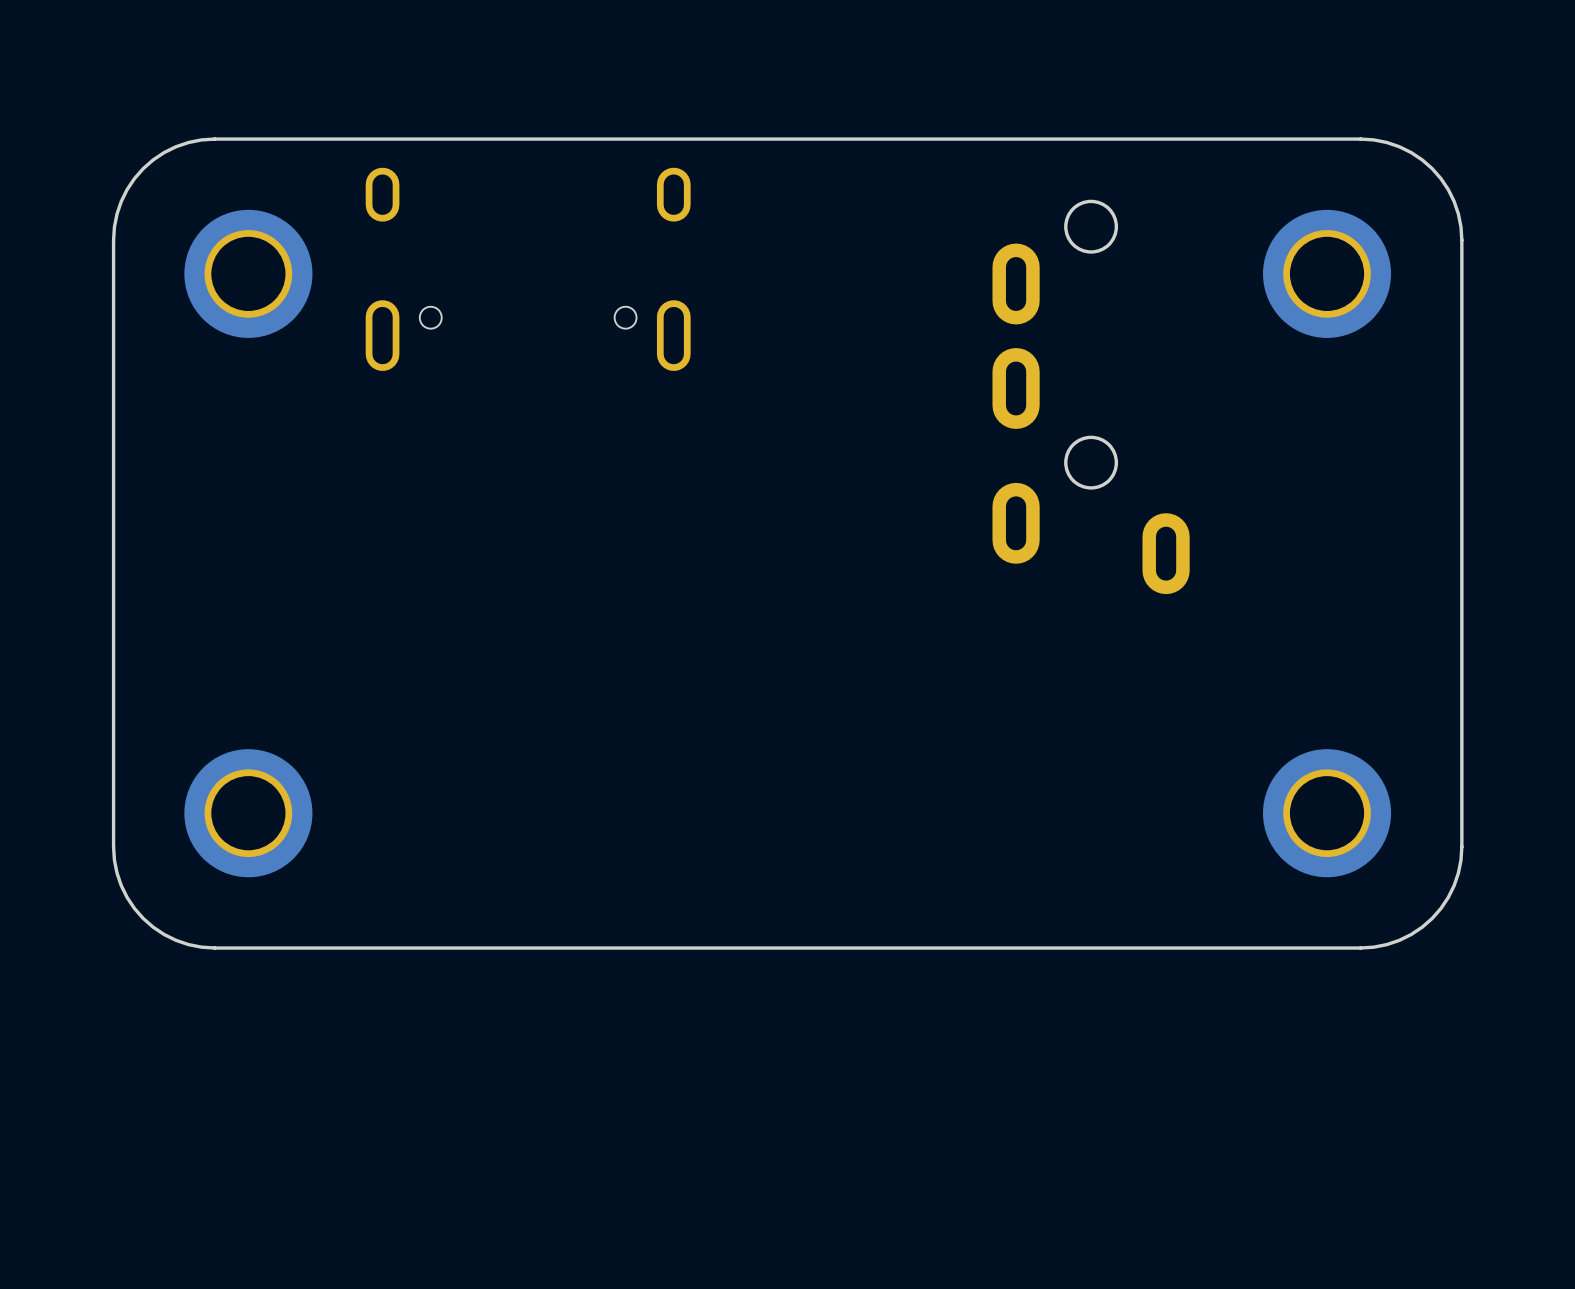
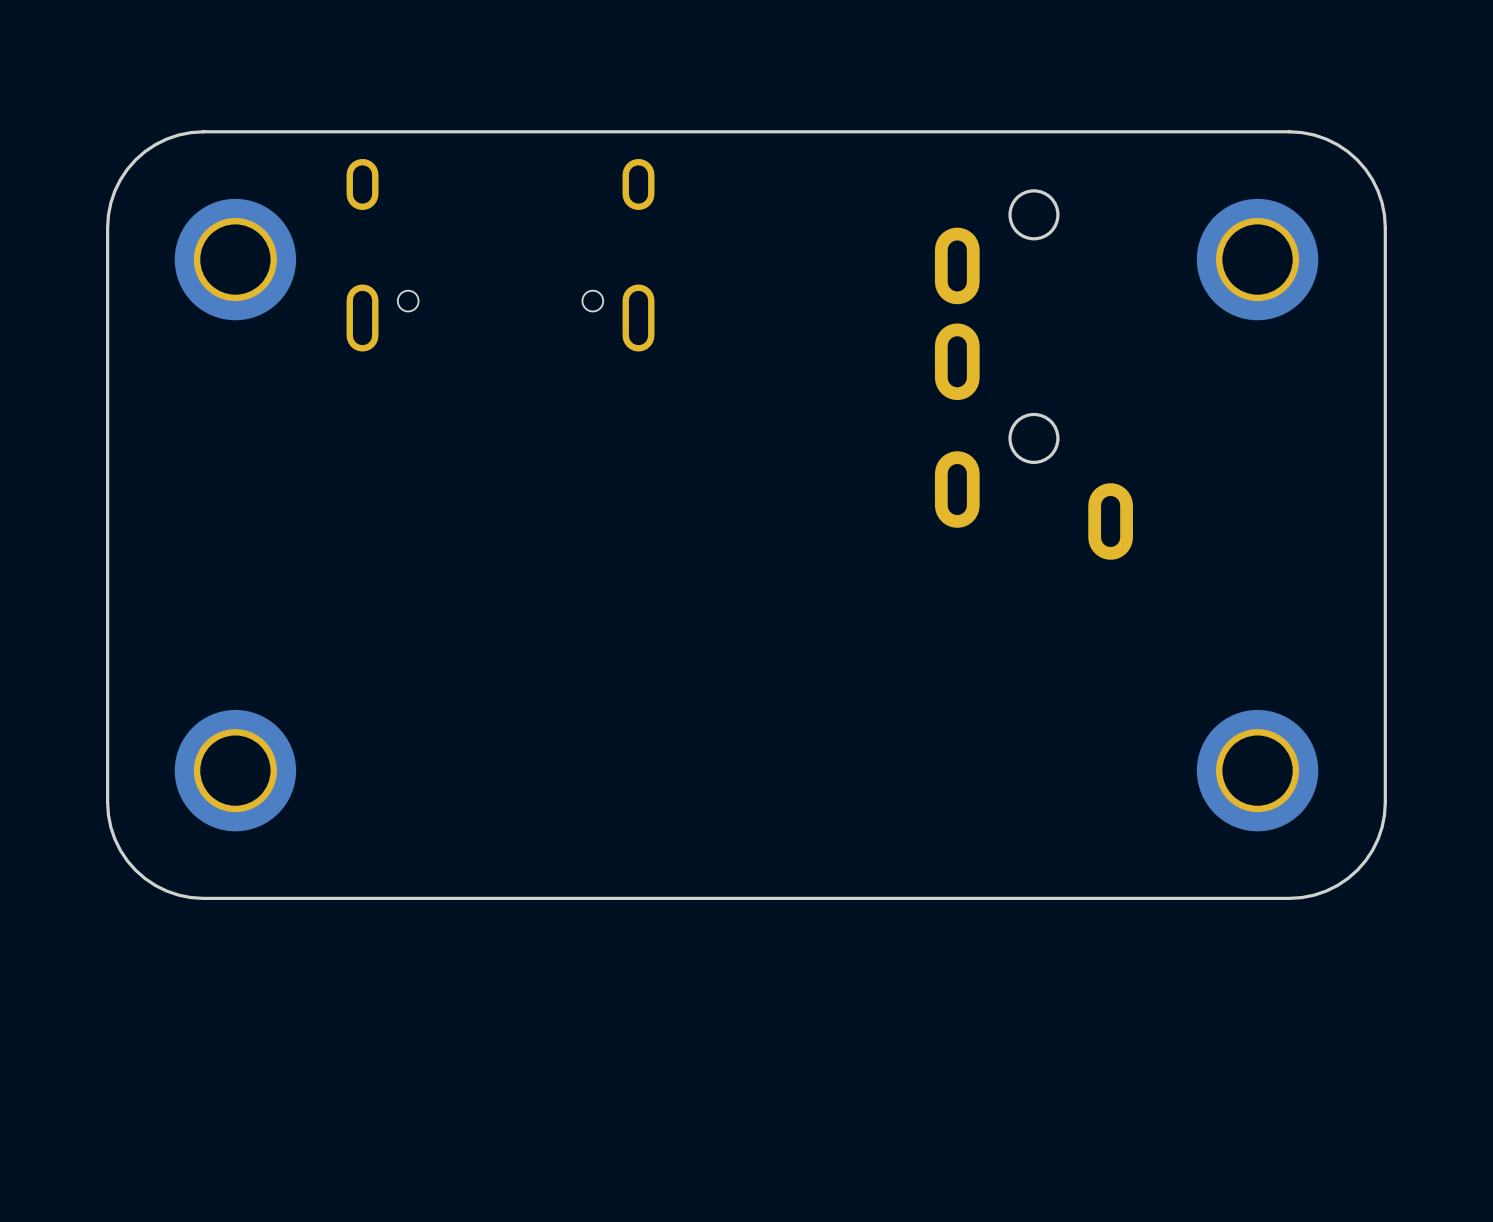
part footprint: [992, 199, 1190, 595] -> [934, 189, 1133, 560]

